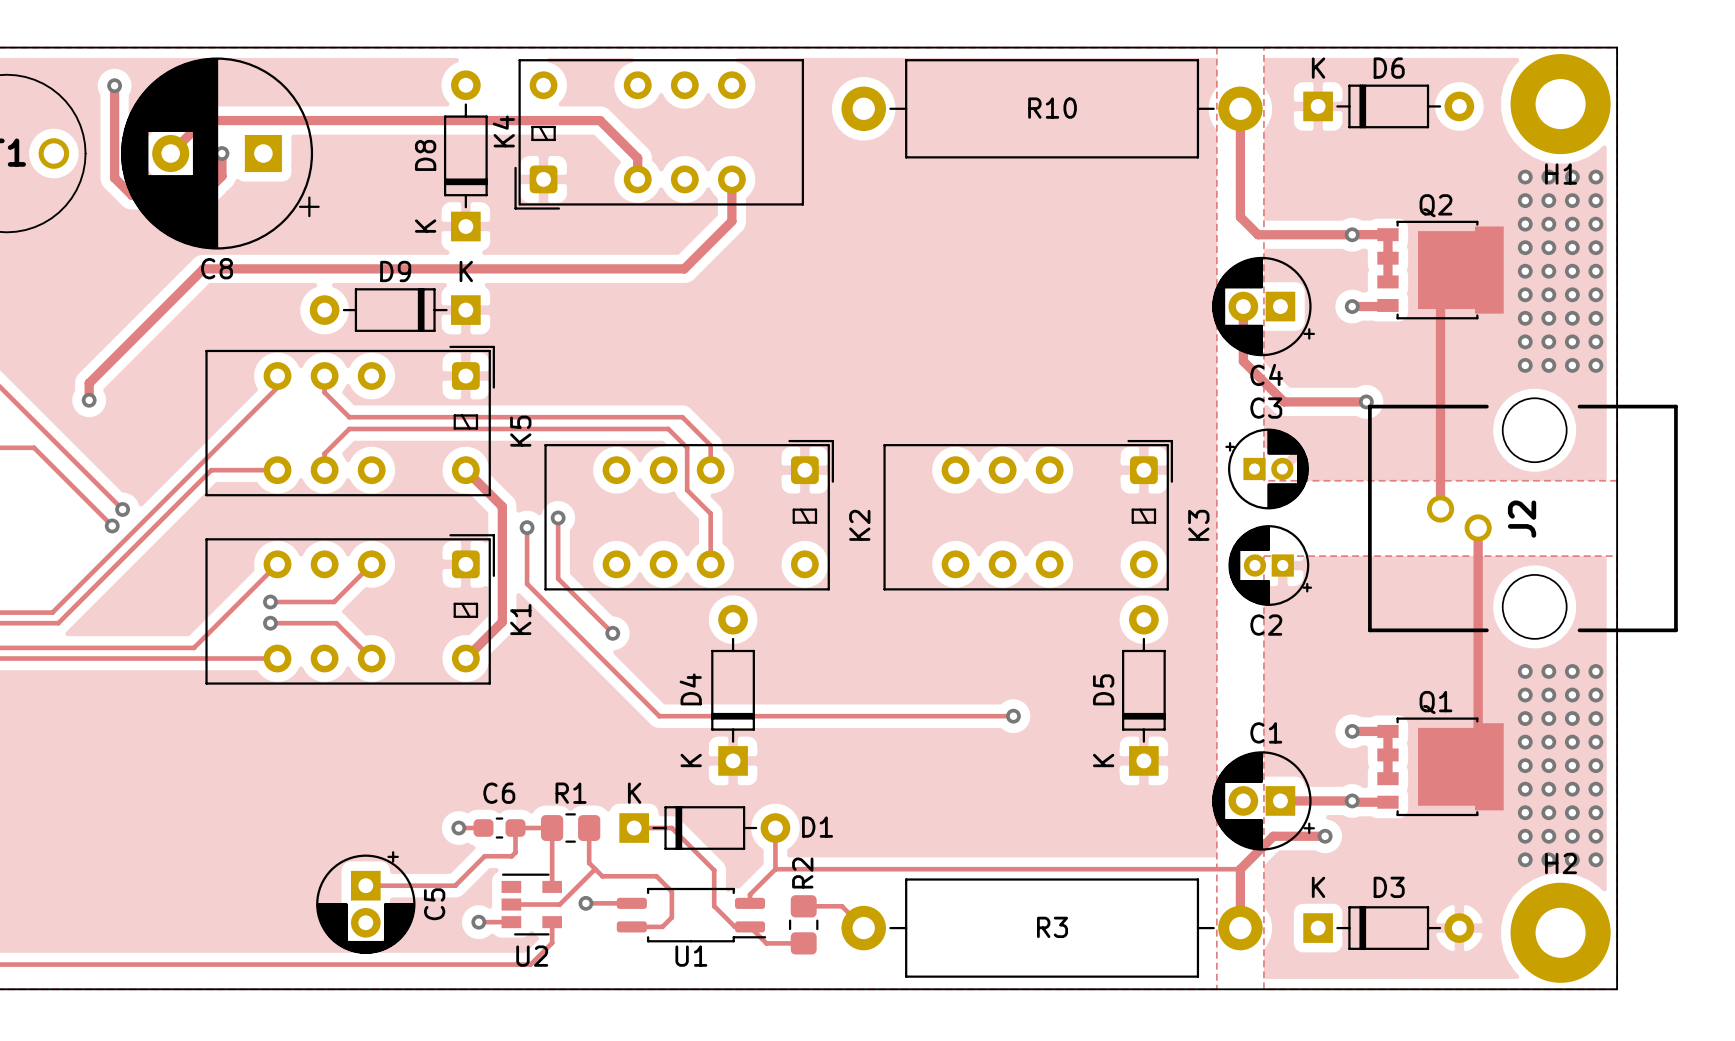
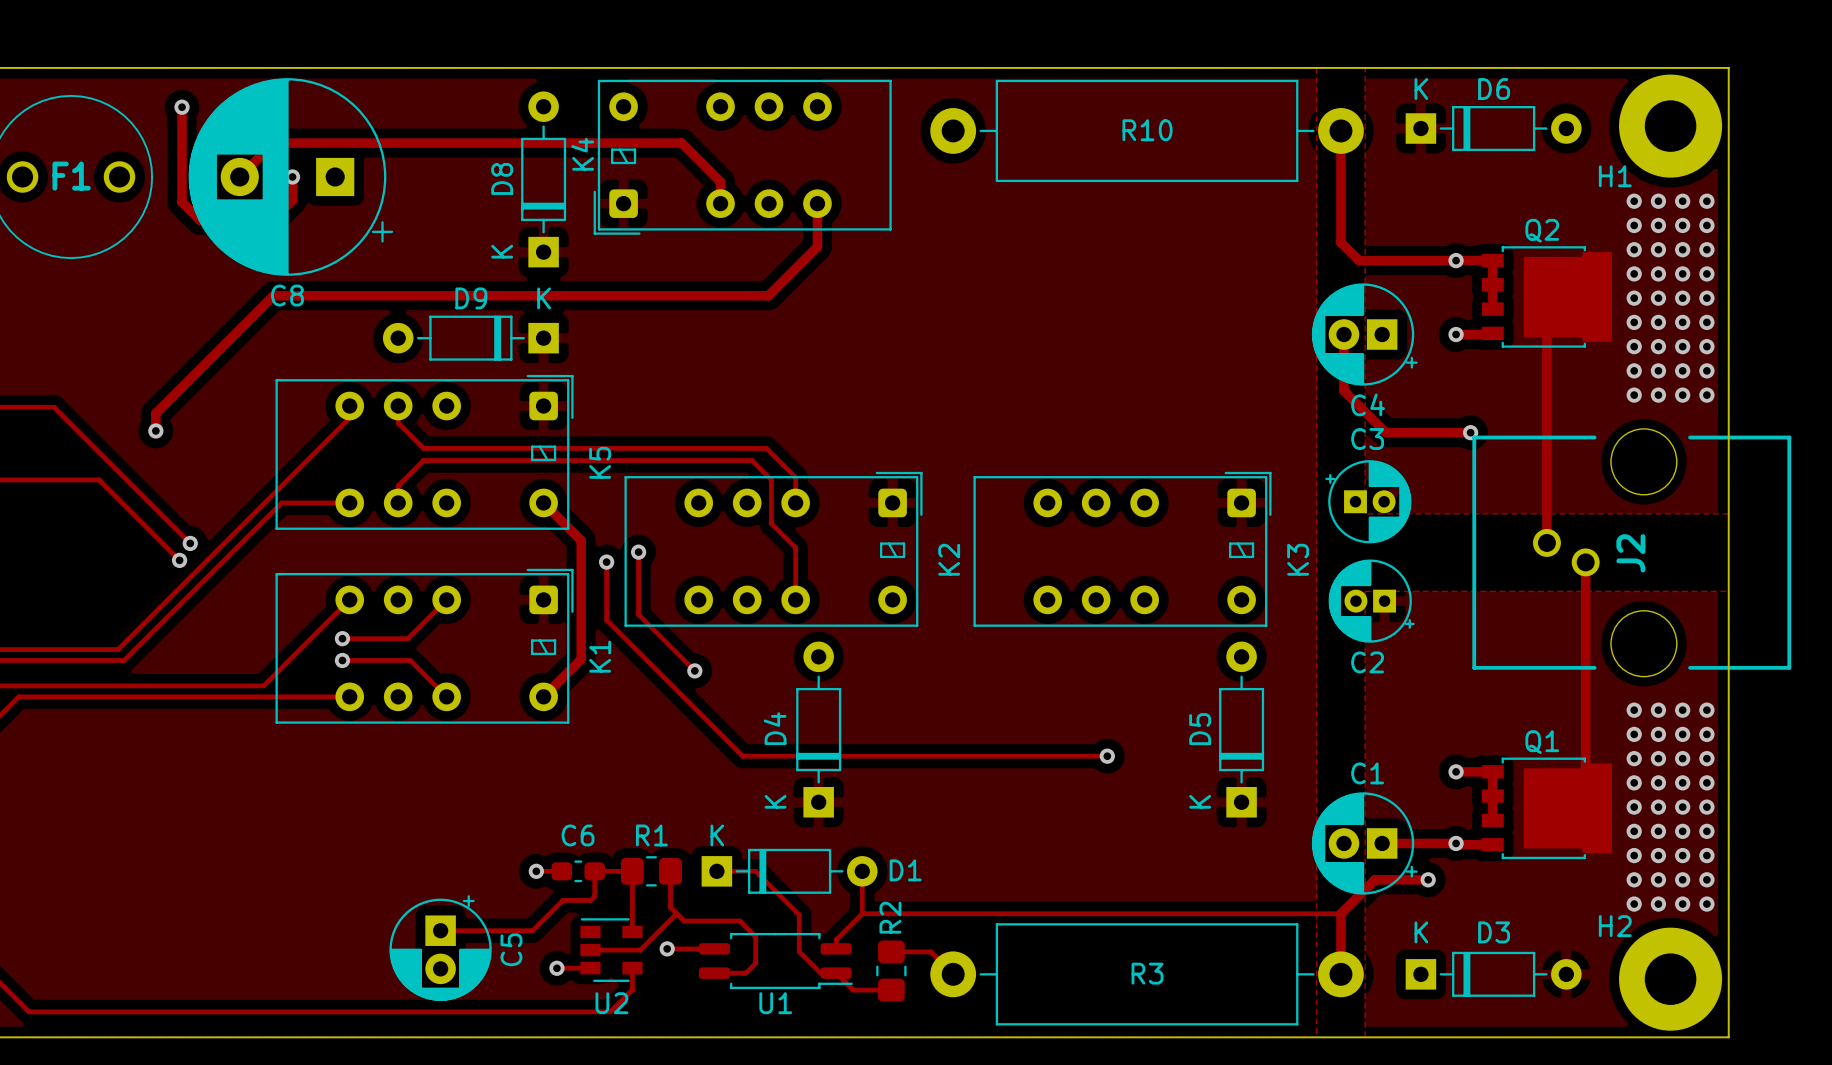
H1 name position: H1 (1561, 174) -> H1 (1615, 176)
H2 name position: H2 (1561, 863) -> H2 (1615, 926)

